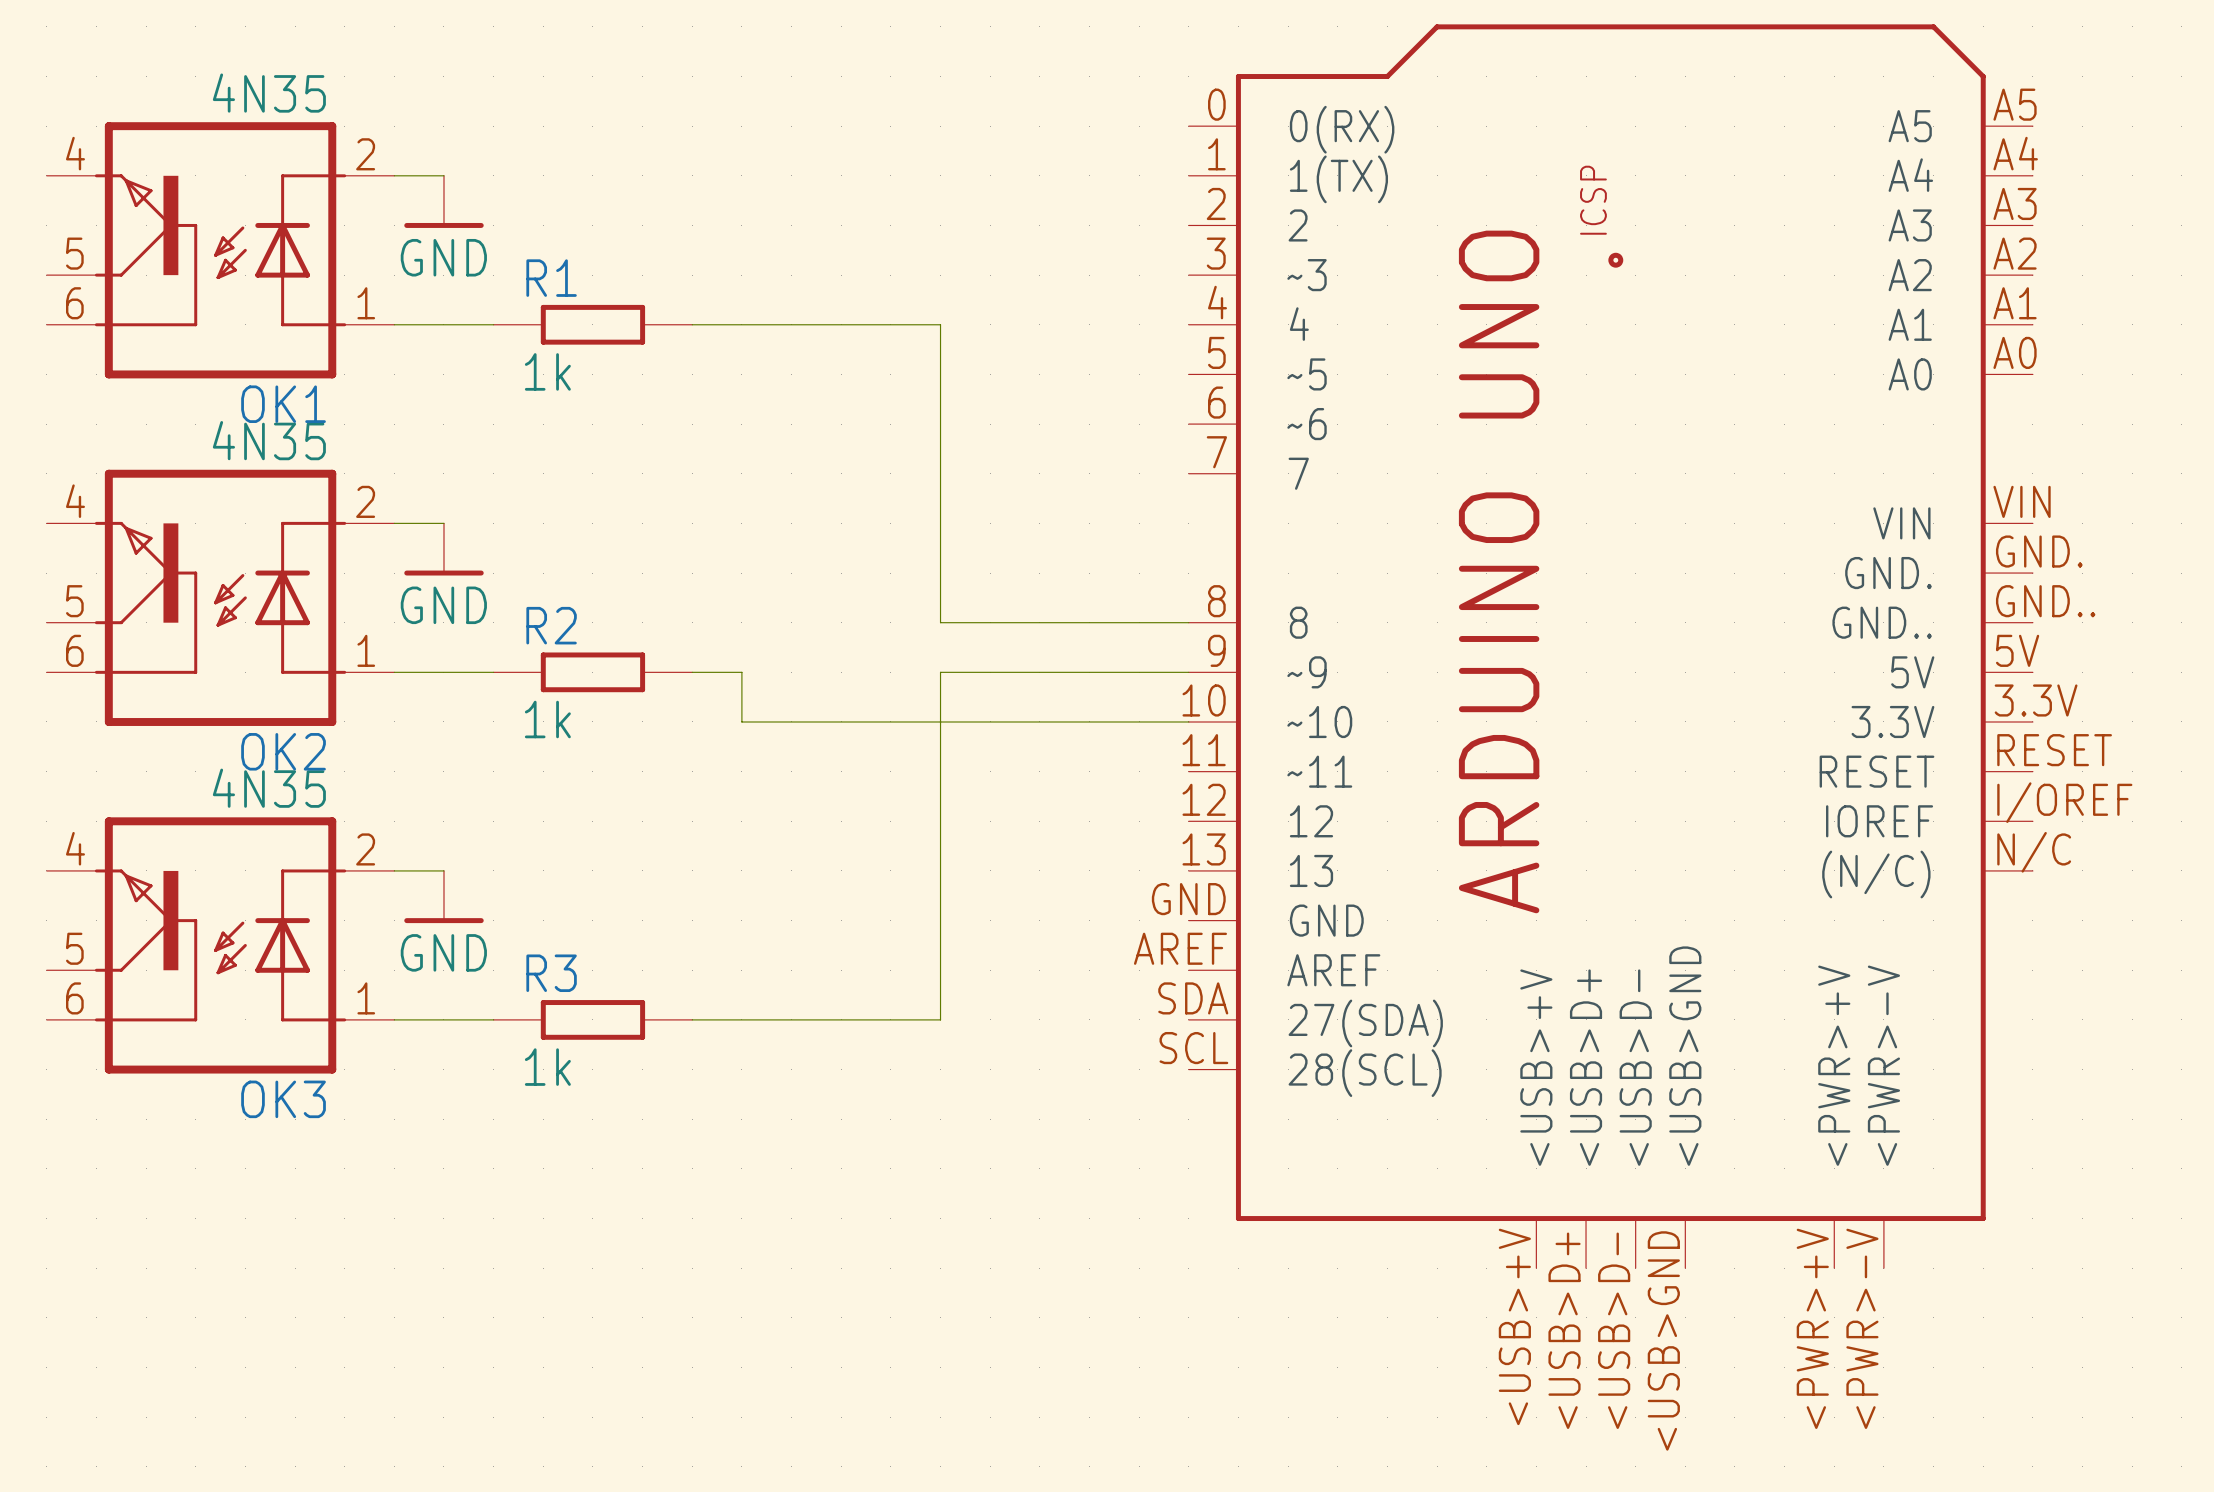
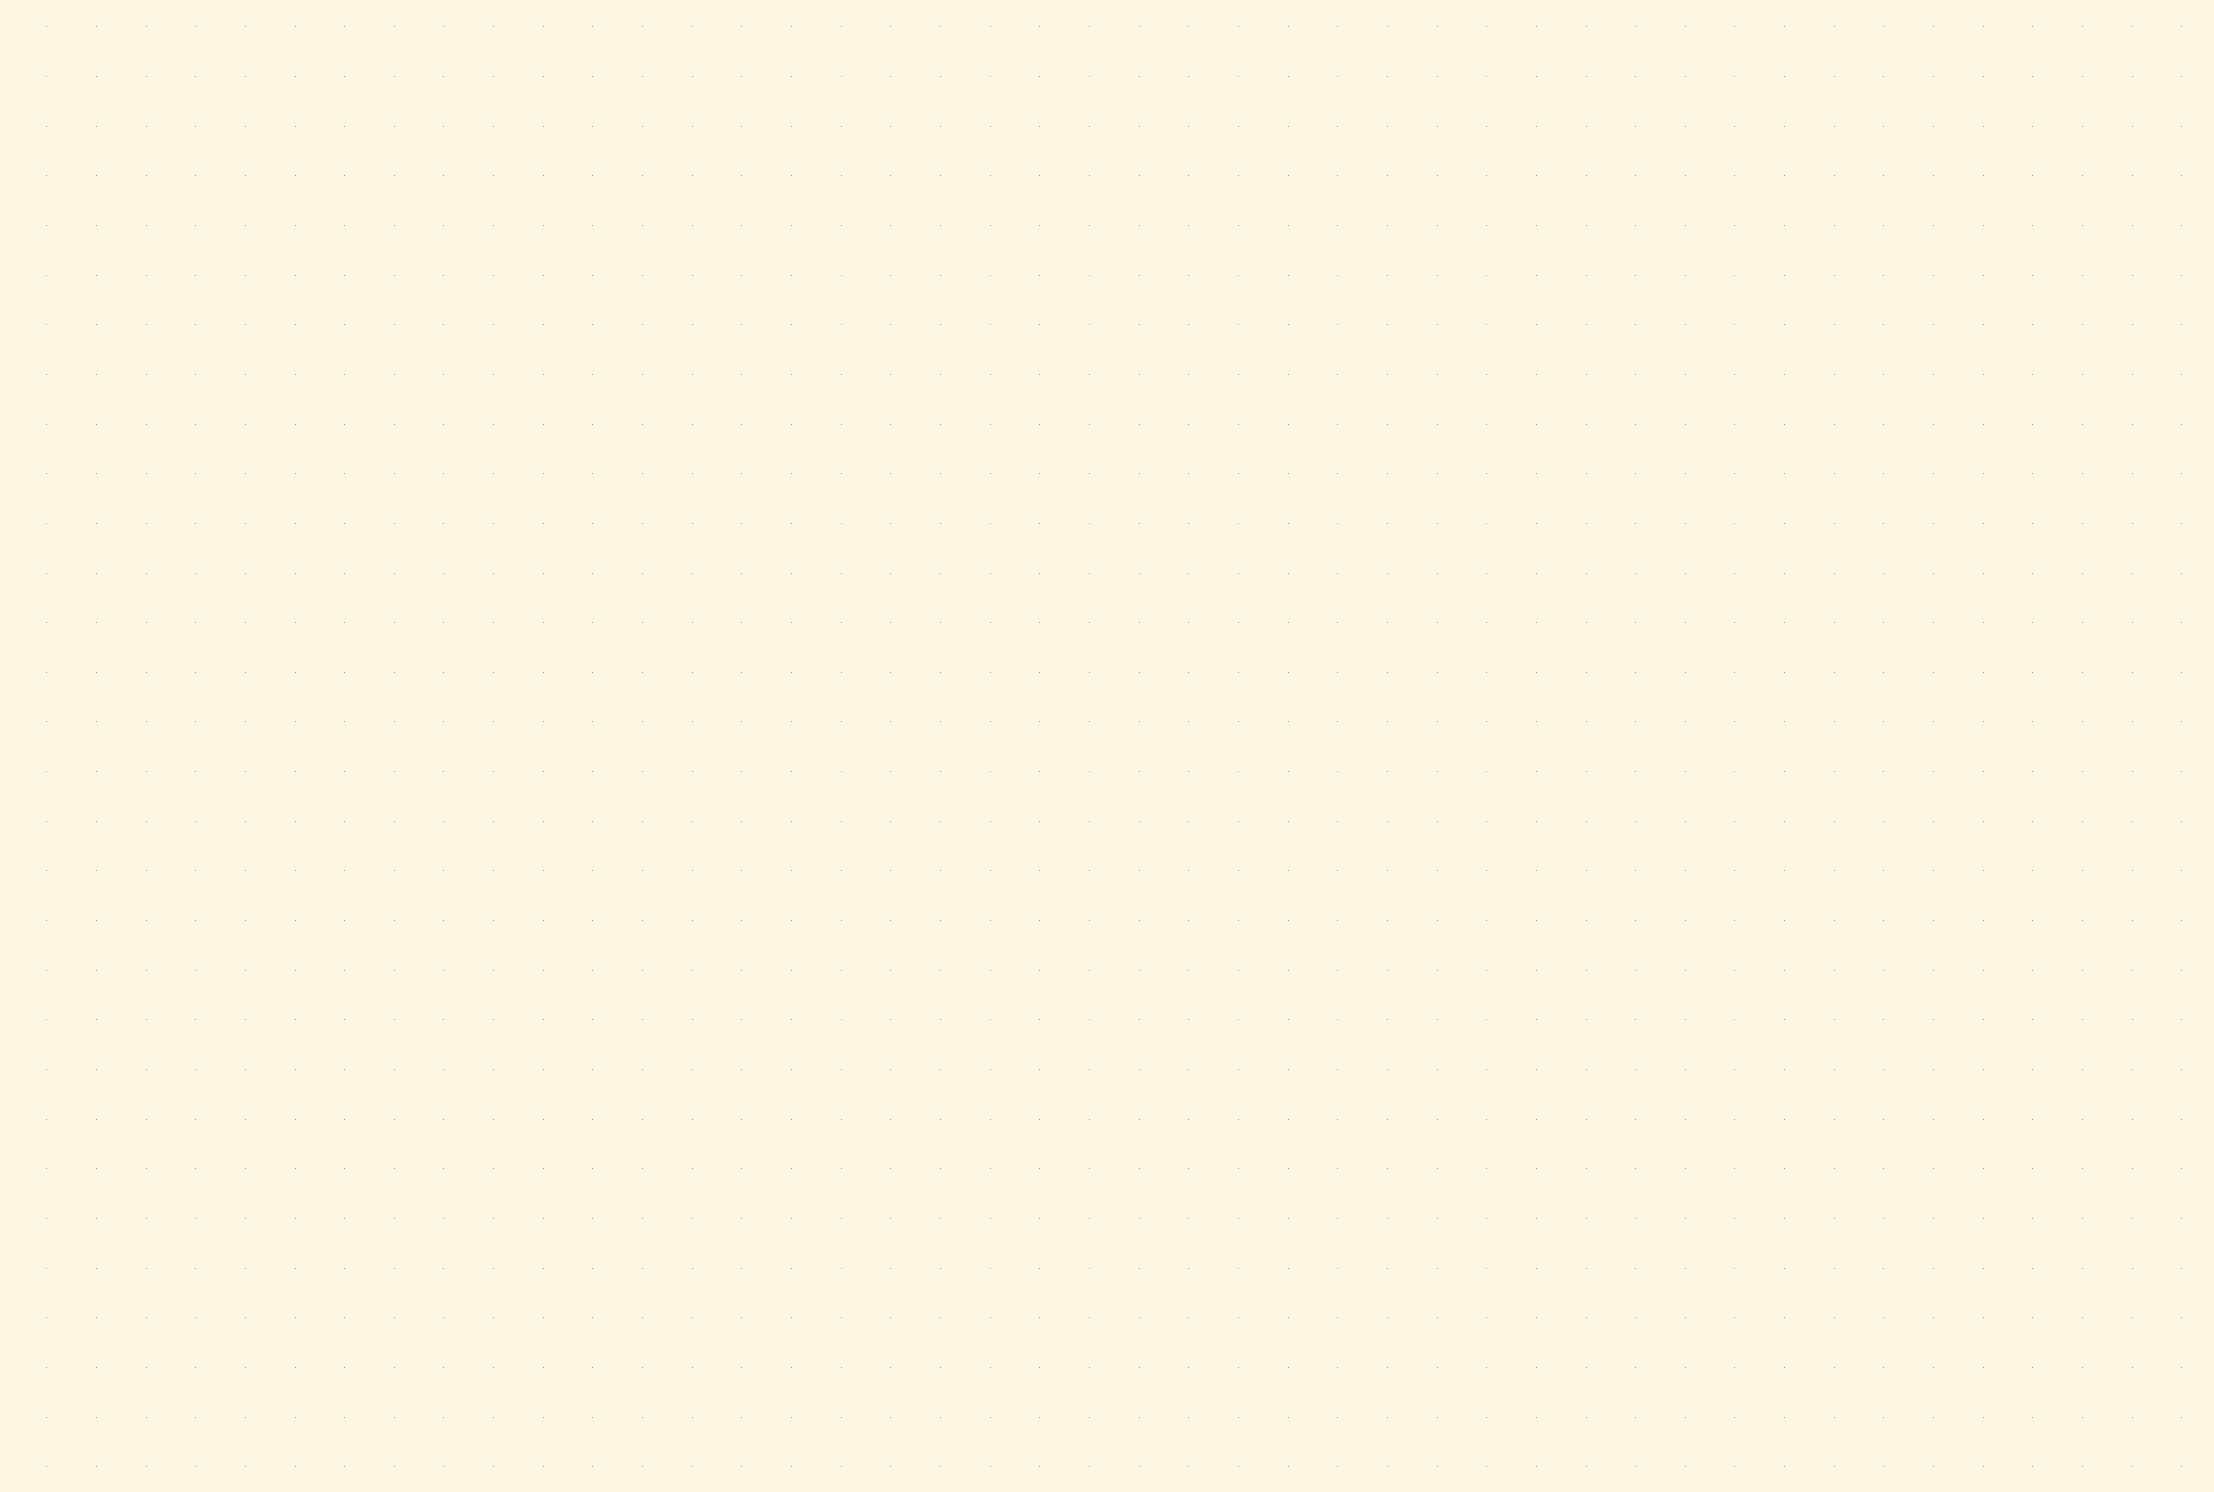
wire: (394, 175) (443, 175) -> none
power symbol: GND (443, 201) -> none
OK1: 4N35 (220, 250) -> none
wire: (394, 324) (493, 324) -> none
R1: 1k (592, 324) -> none
wire: (692, 324) (940, 324) (940, 622) (1188, 622) -> none
wire: (394, 523) (443, 523) -> none
power symbol: GND (443, 549) -> none
OK2: 4N35 (220, 597) -> none
part: (1610, 646) -> none
wire: (394, 672) (493, 672) -> none
R2: 1k (592, 672) -> none
wire: (692, 672) (741, 672) (741, 721) (1188, 721) -> none
wire: (1188, 672) (940, 672) (940, 1019) (692, 1019) -> none
wire: (394, 870) (443, 870) -> none
power symbol: GND (443, 897) -> none
OK3: 4N35 (220, 945) -> none
wire: (394, 1019) (493, 1019) -> none
R3: 1k (592, 1019) -> none

